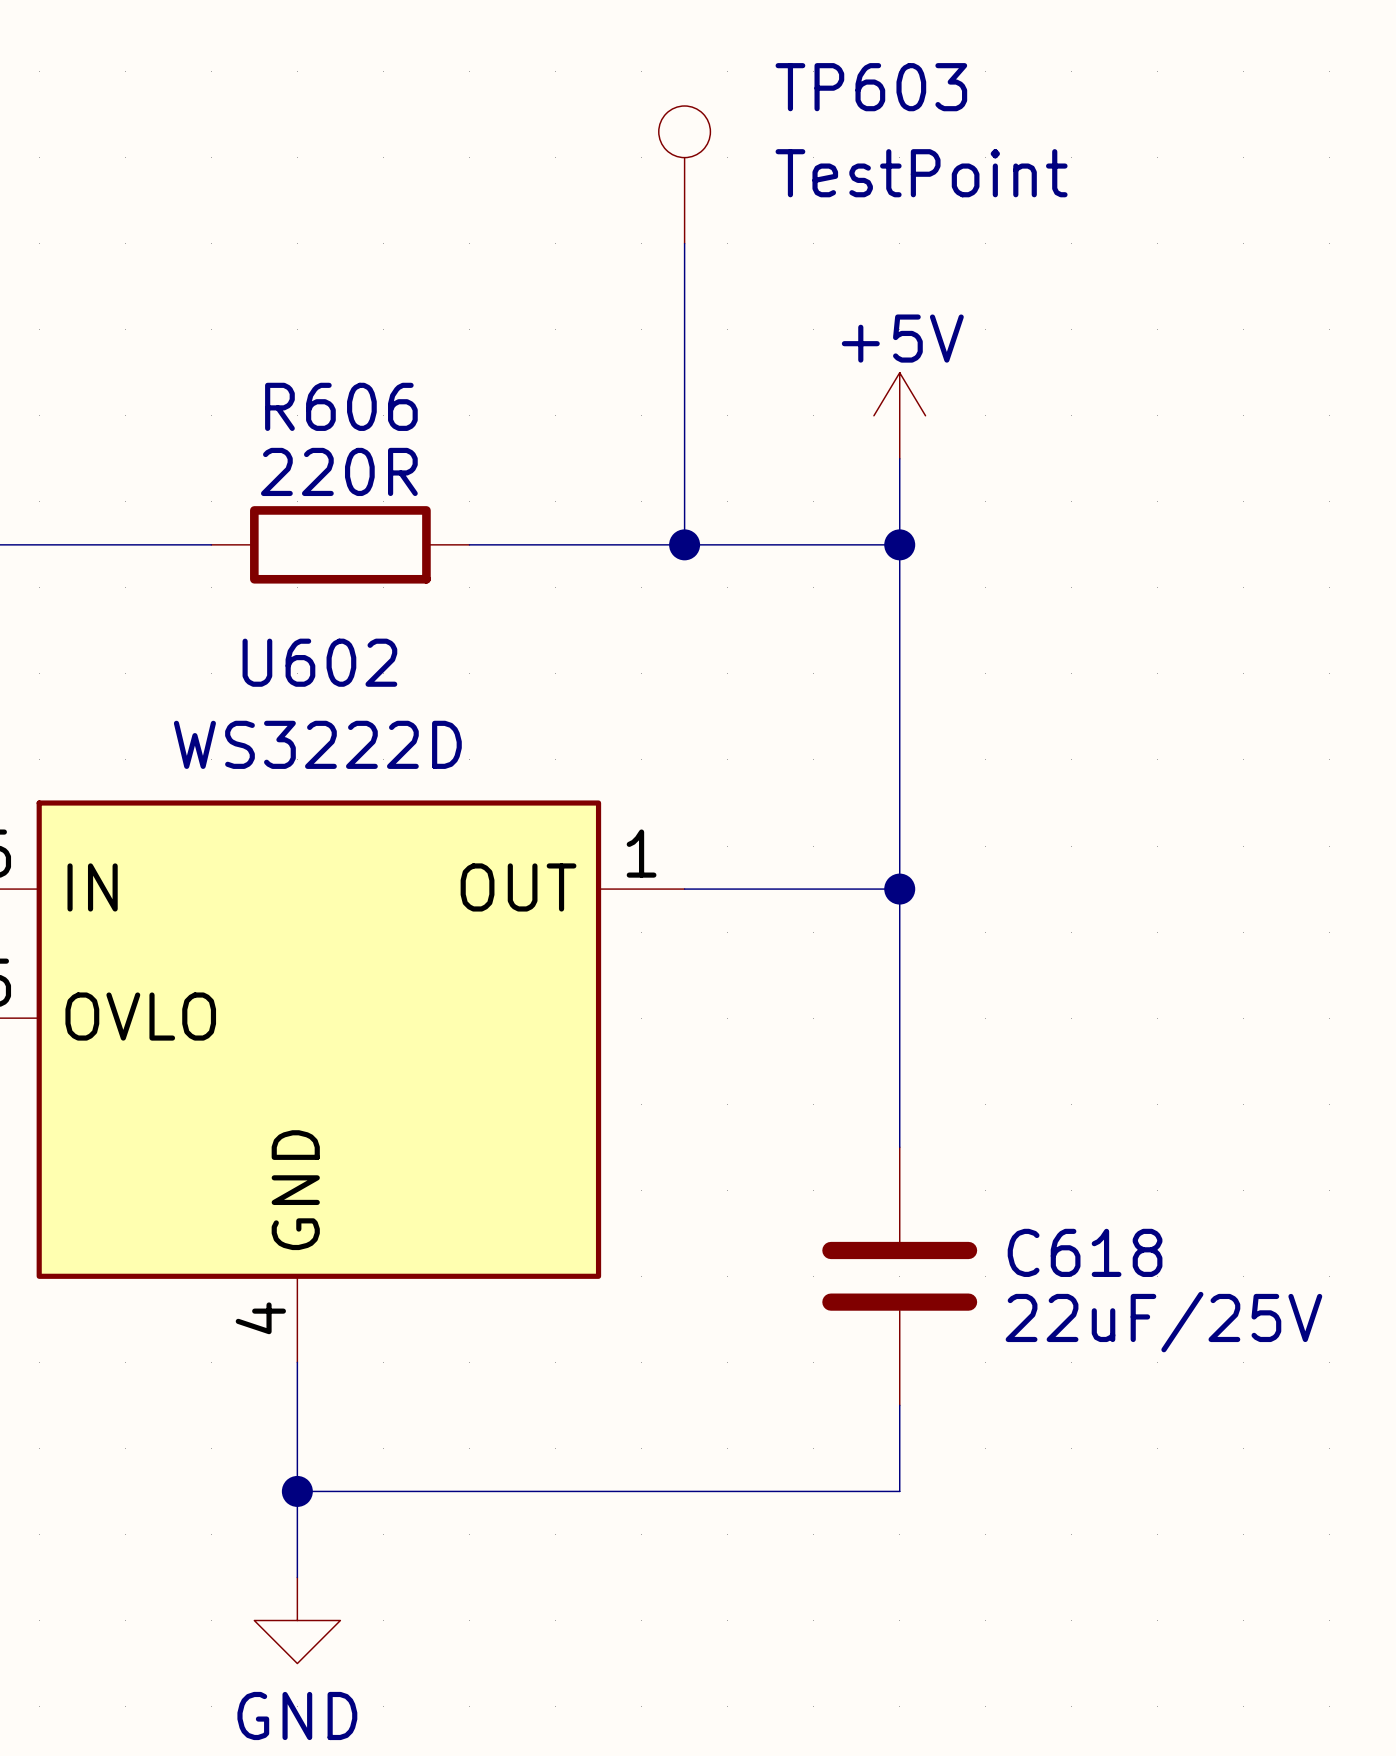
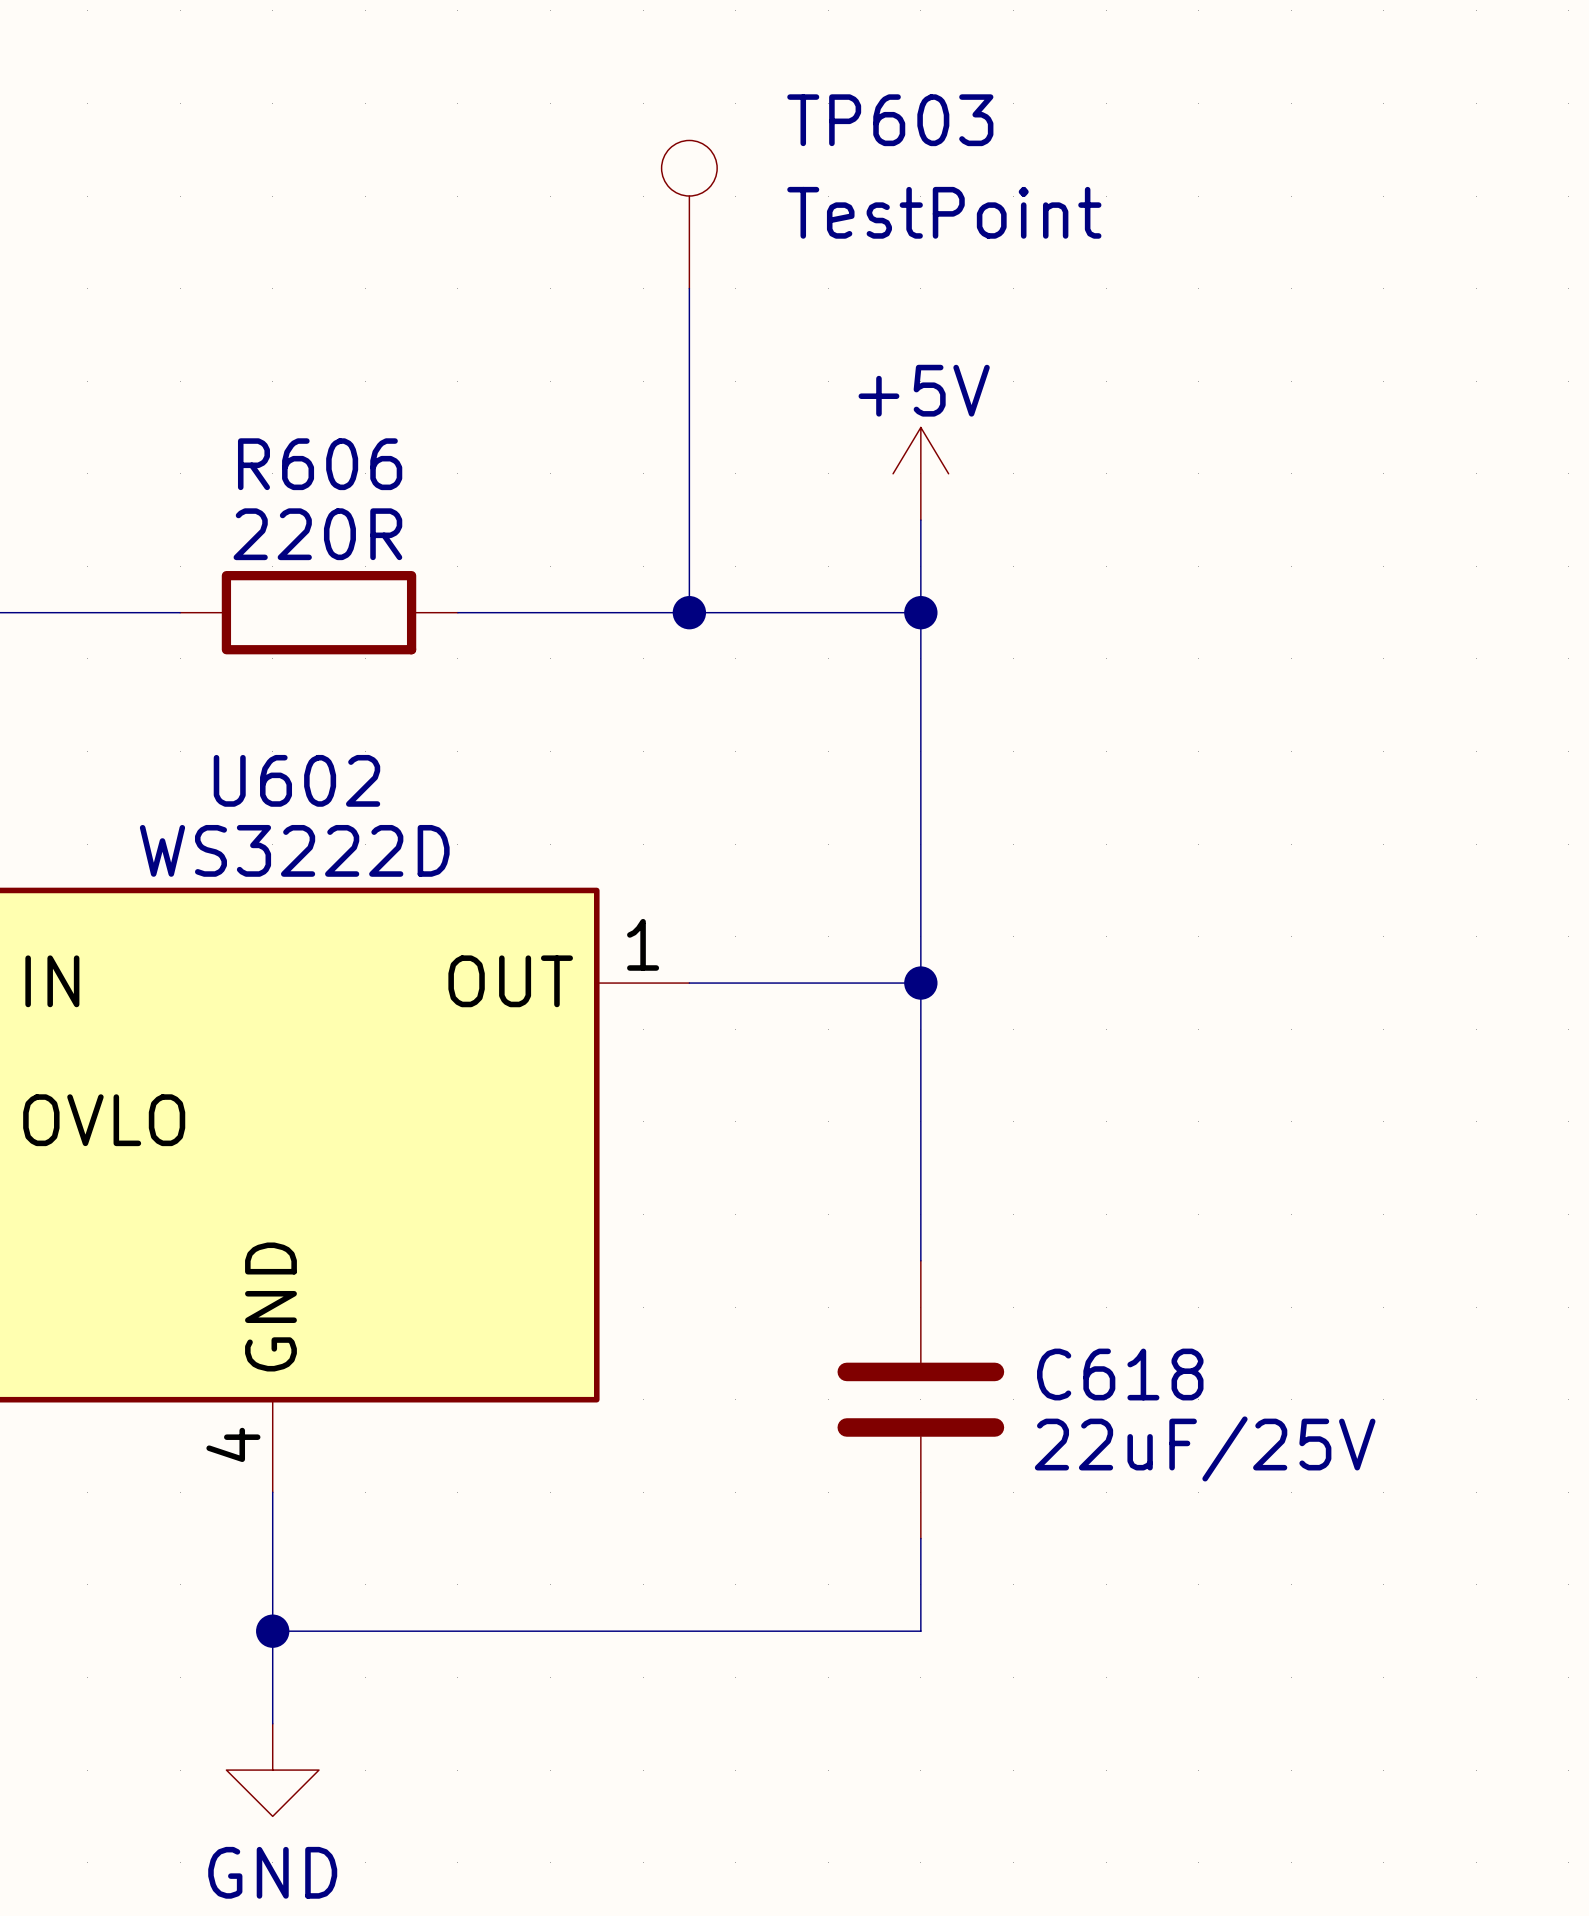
U602 name position: U602 (319, 662) -> U602 (296, 780)
U602 value position: WS3222D (317, 744) -> WS3222D (294, 850)

